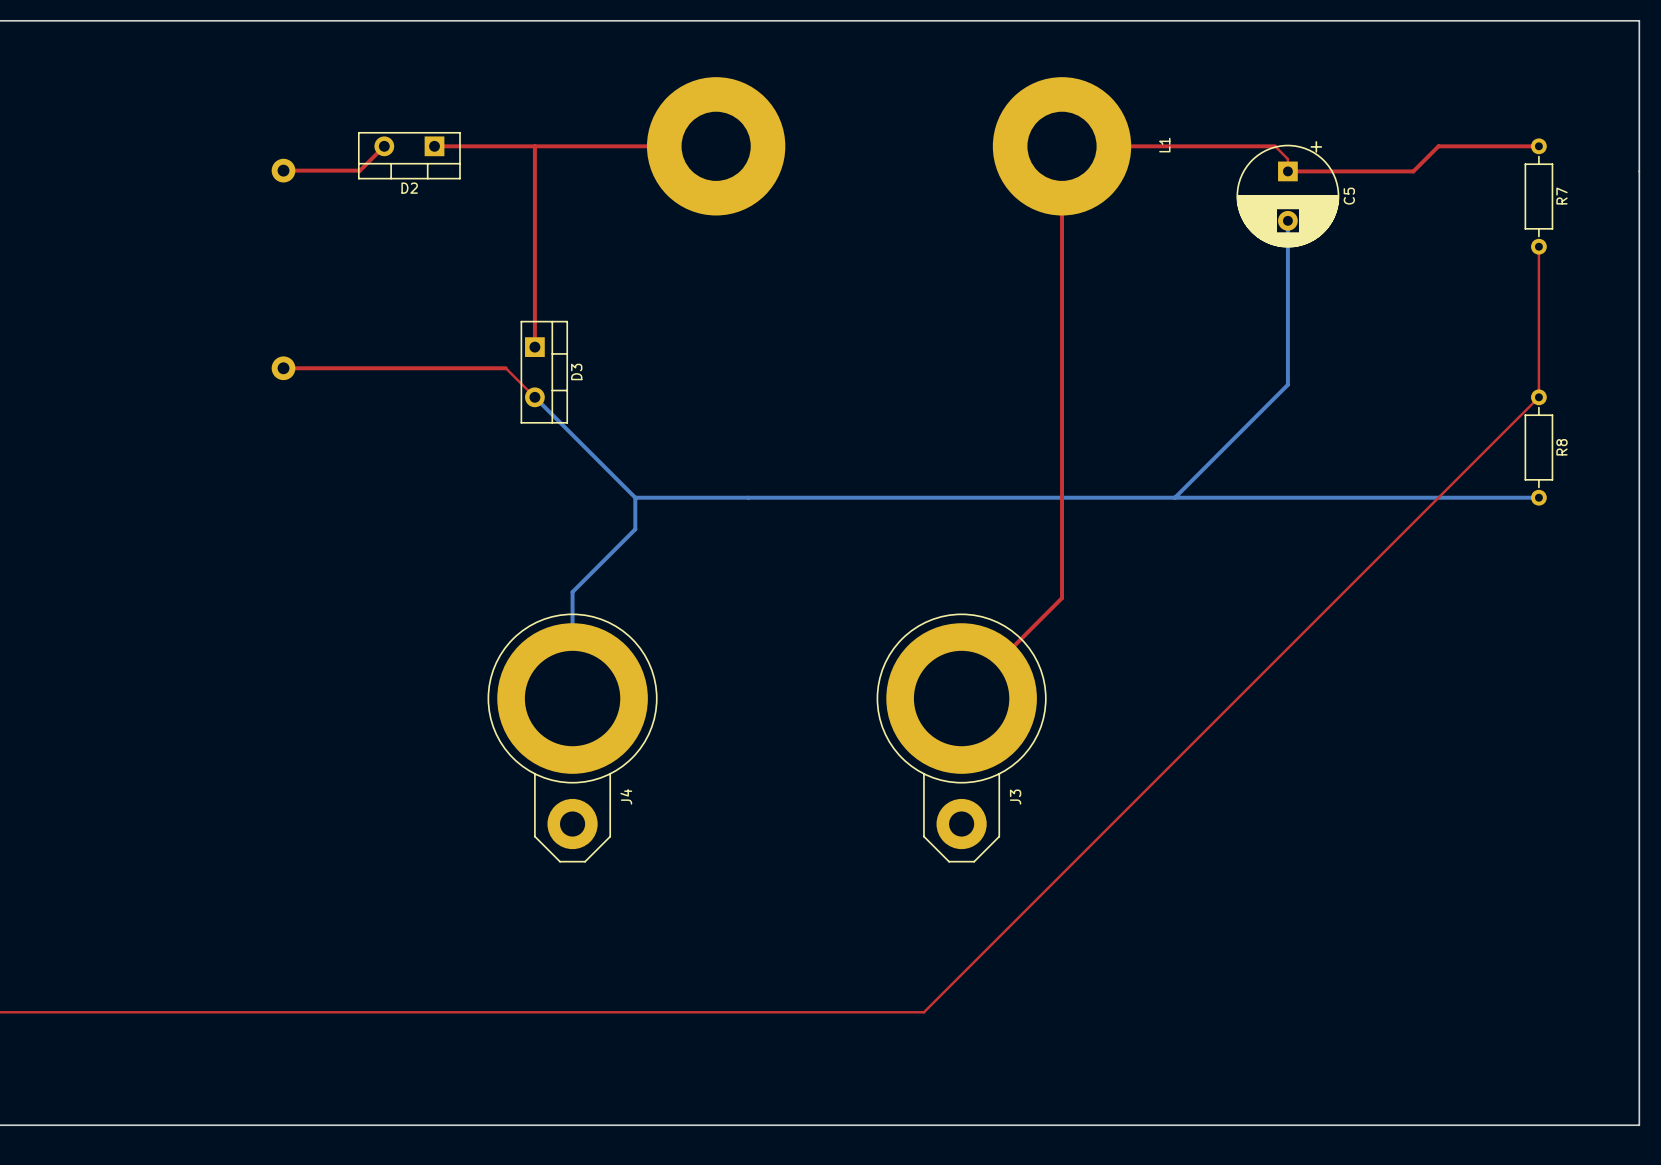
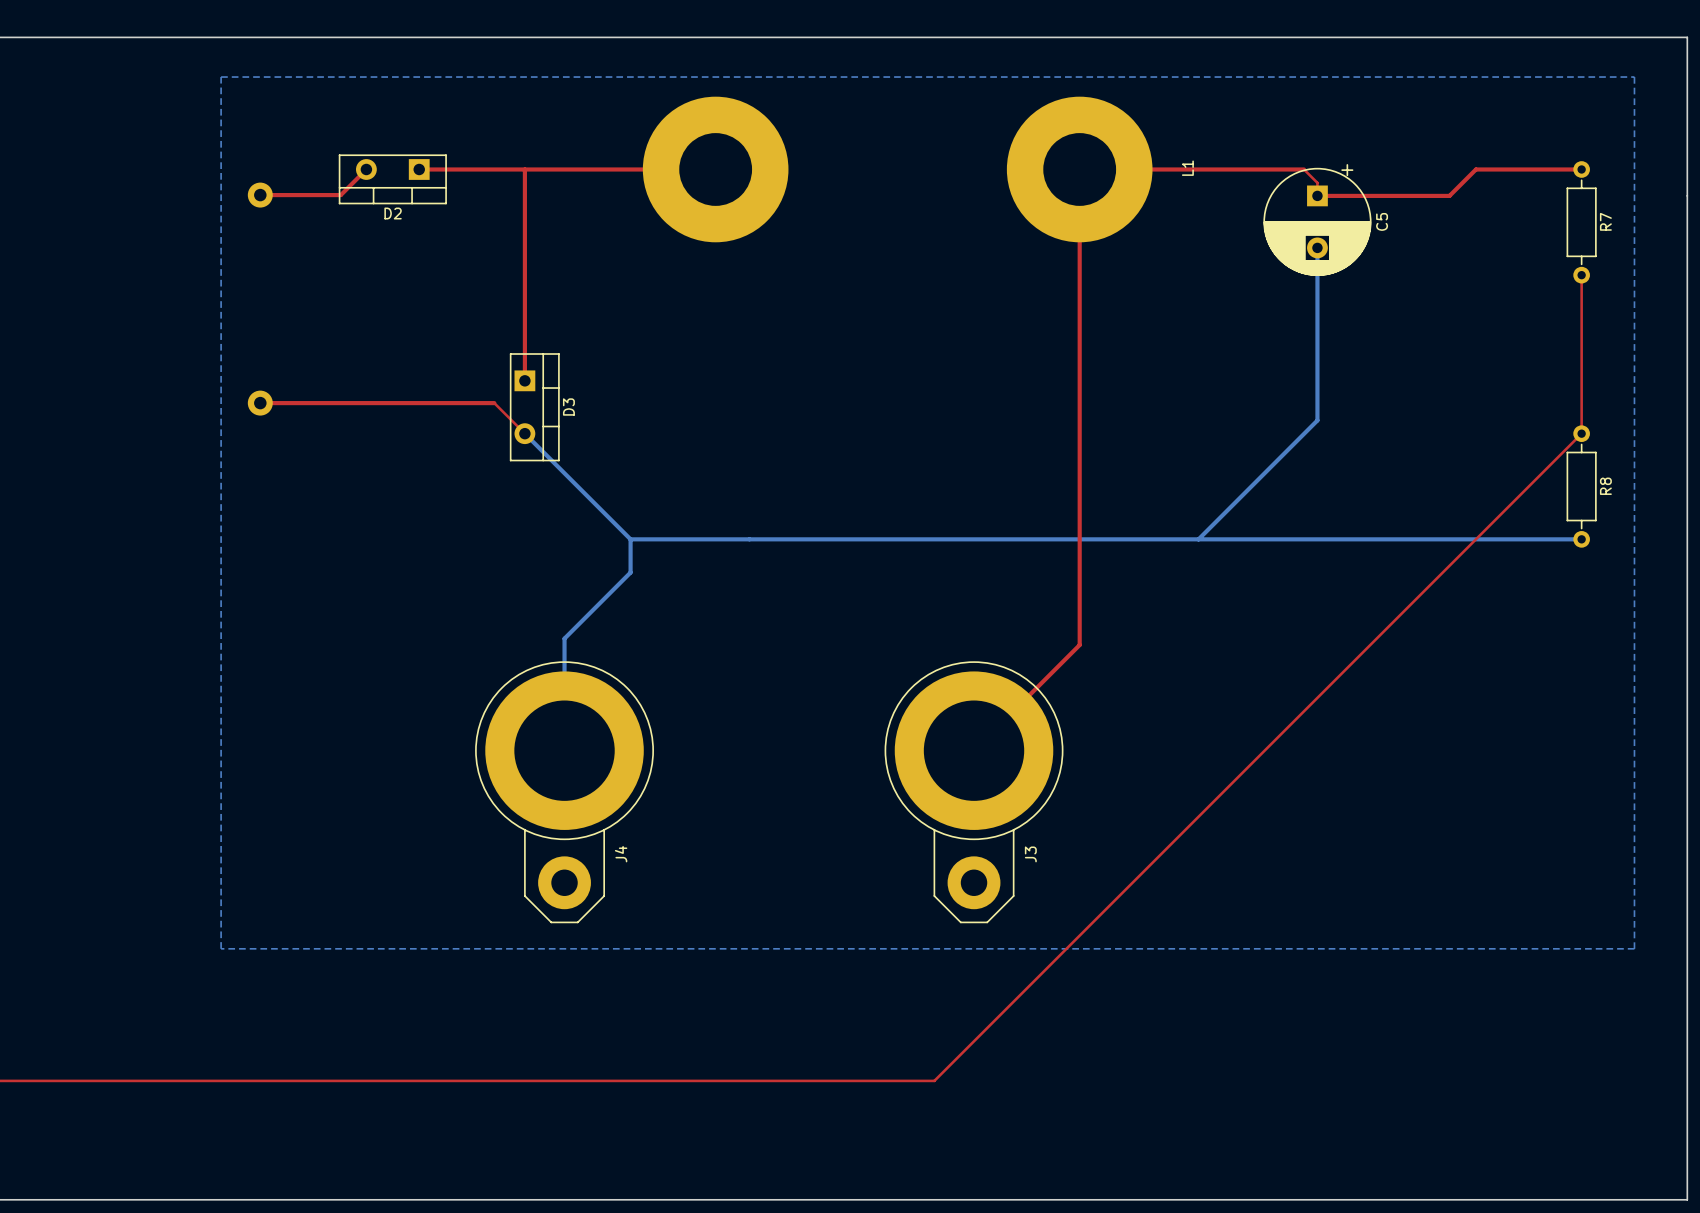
bottom zone outline: none -> (221, 77) (221, 948) (1634, 948) (1634, 77) (221, 77)

